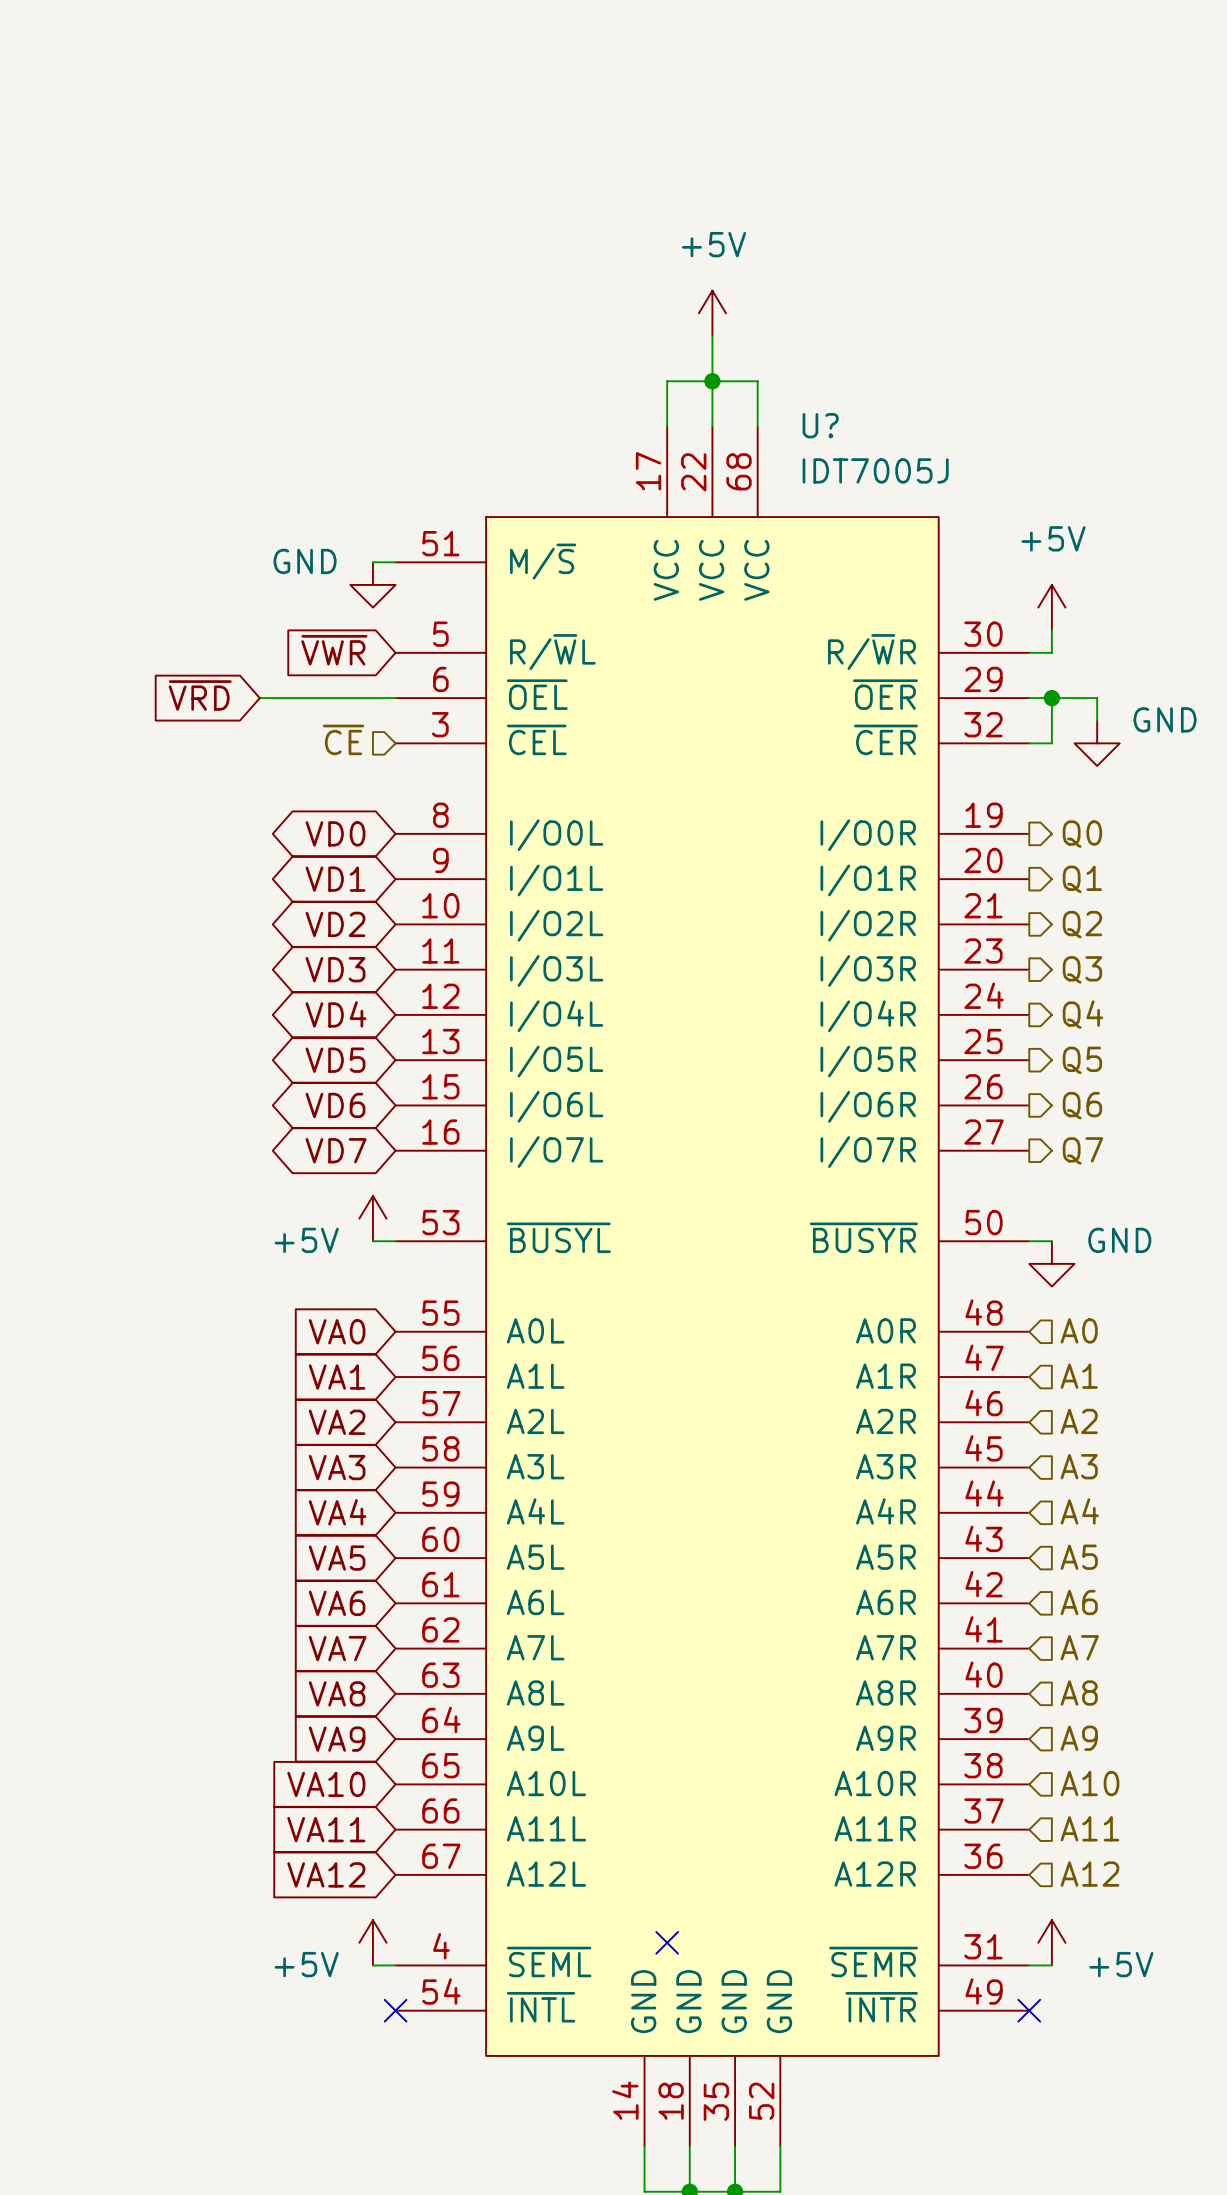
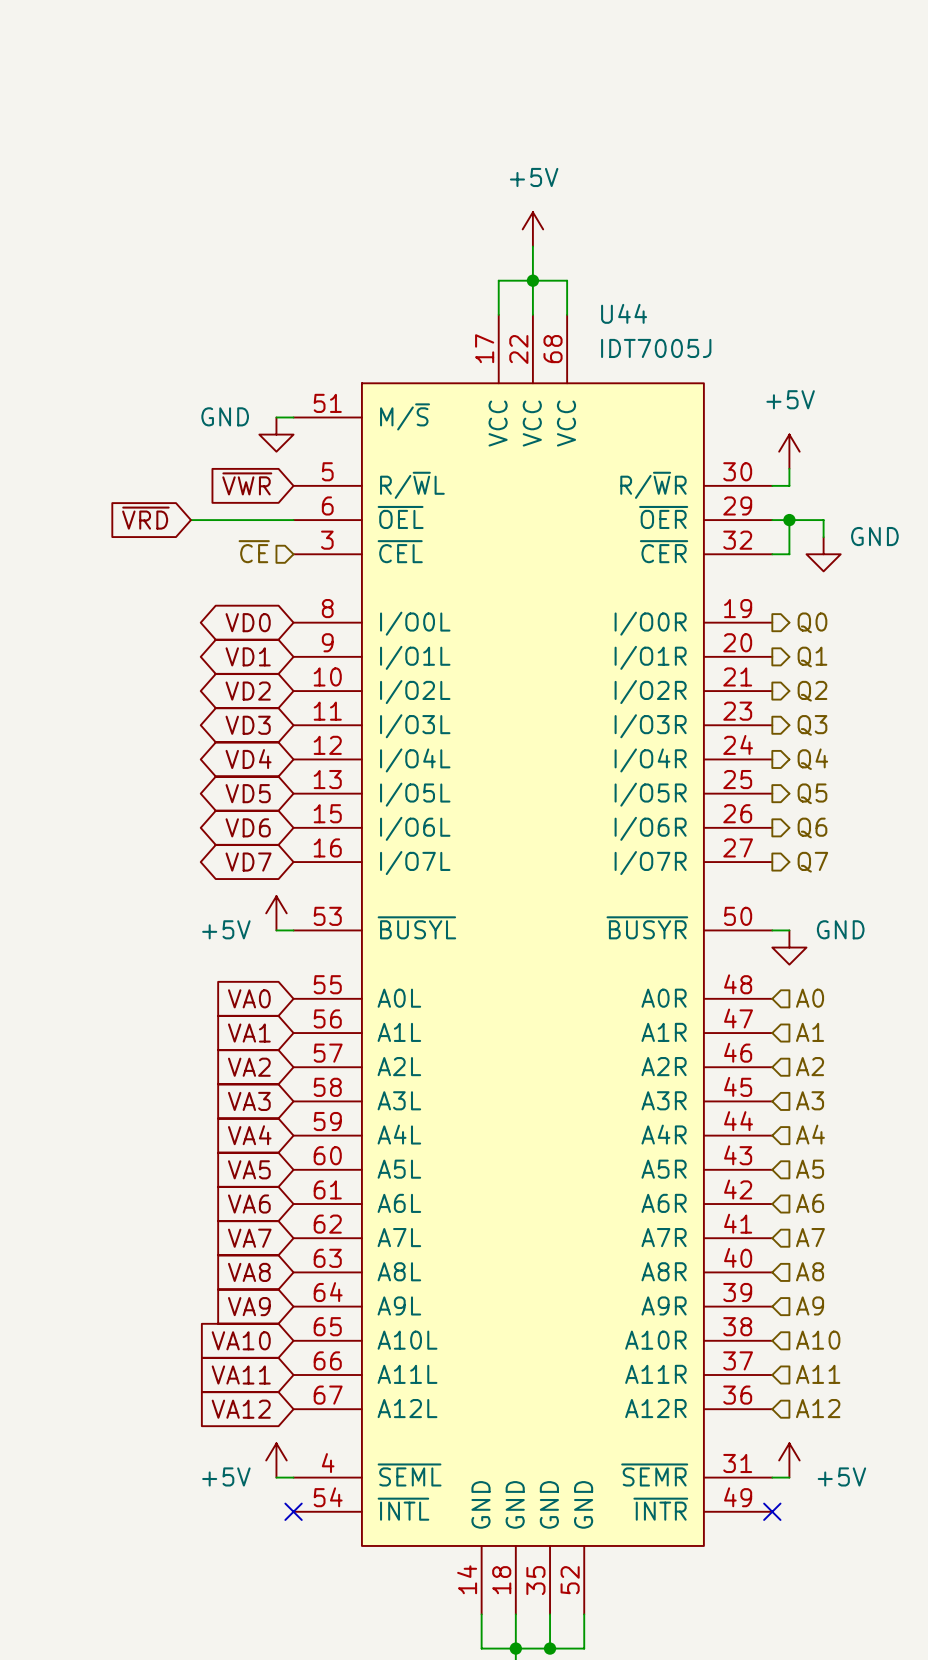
U? name: U? (820, 425) -> U44 (624, 313)
no-connect mark: (667, 1942) -> none

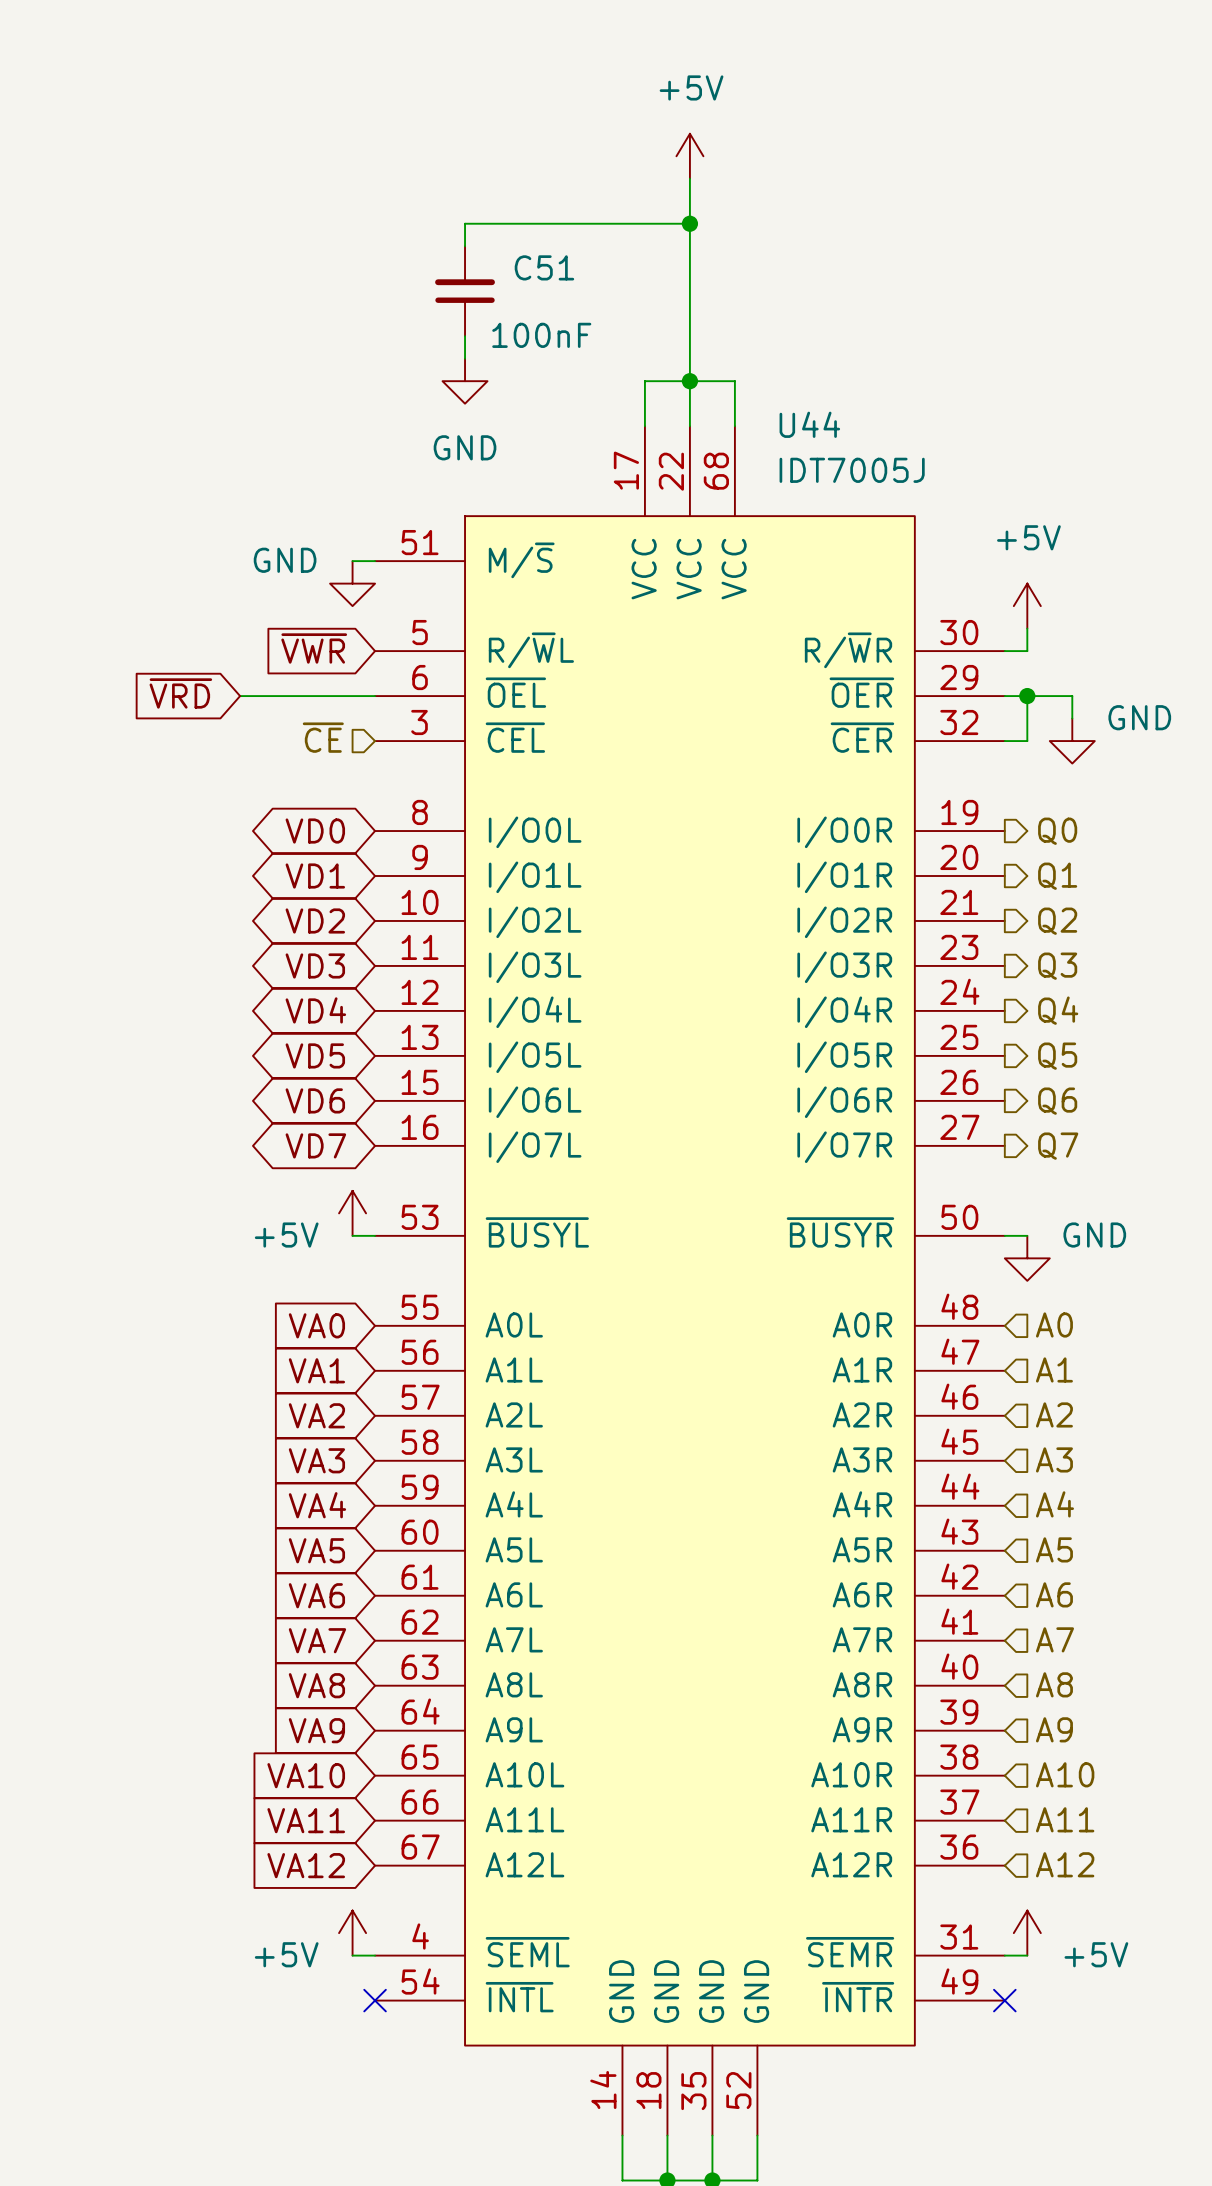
wire: none -> (689, 178) (689, 336)
wire: none -> (689, 223) (465, 223) (465, 246)
junction: none -> (689, 223)
C51: none -> 100nF (465, 291)
power symbol position: +5V (532, 229) -> +5V (689, 156)
wire: none -> (465, 336) (465, 358)
power symbol: none -> GND (465, 381)

